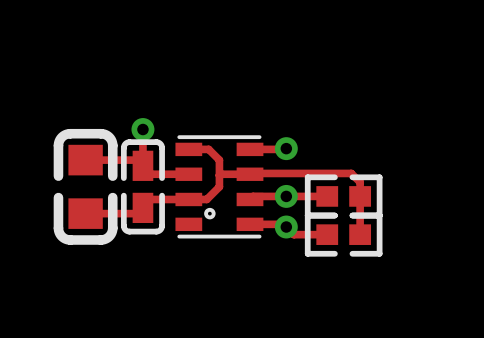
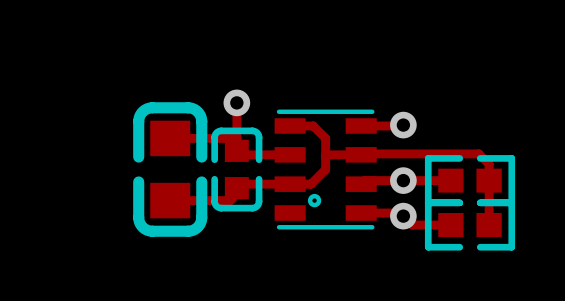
part footprint: [120, 139, 165, 235] -> [211, 127, 263, 212]

